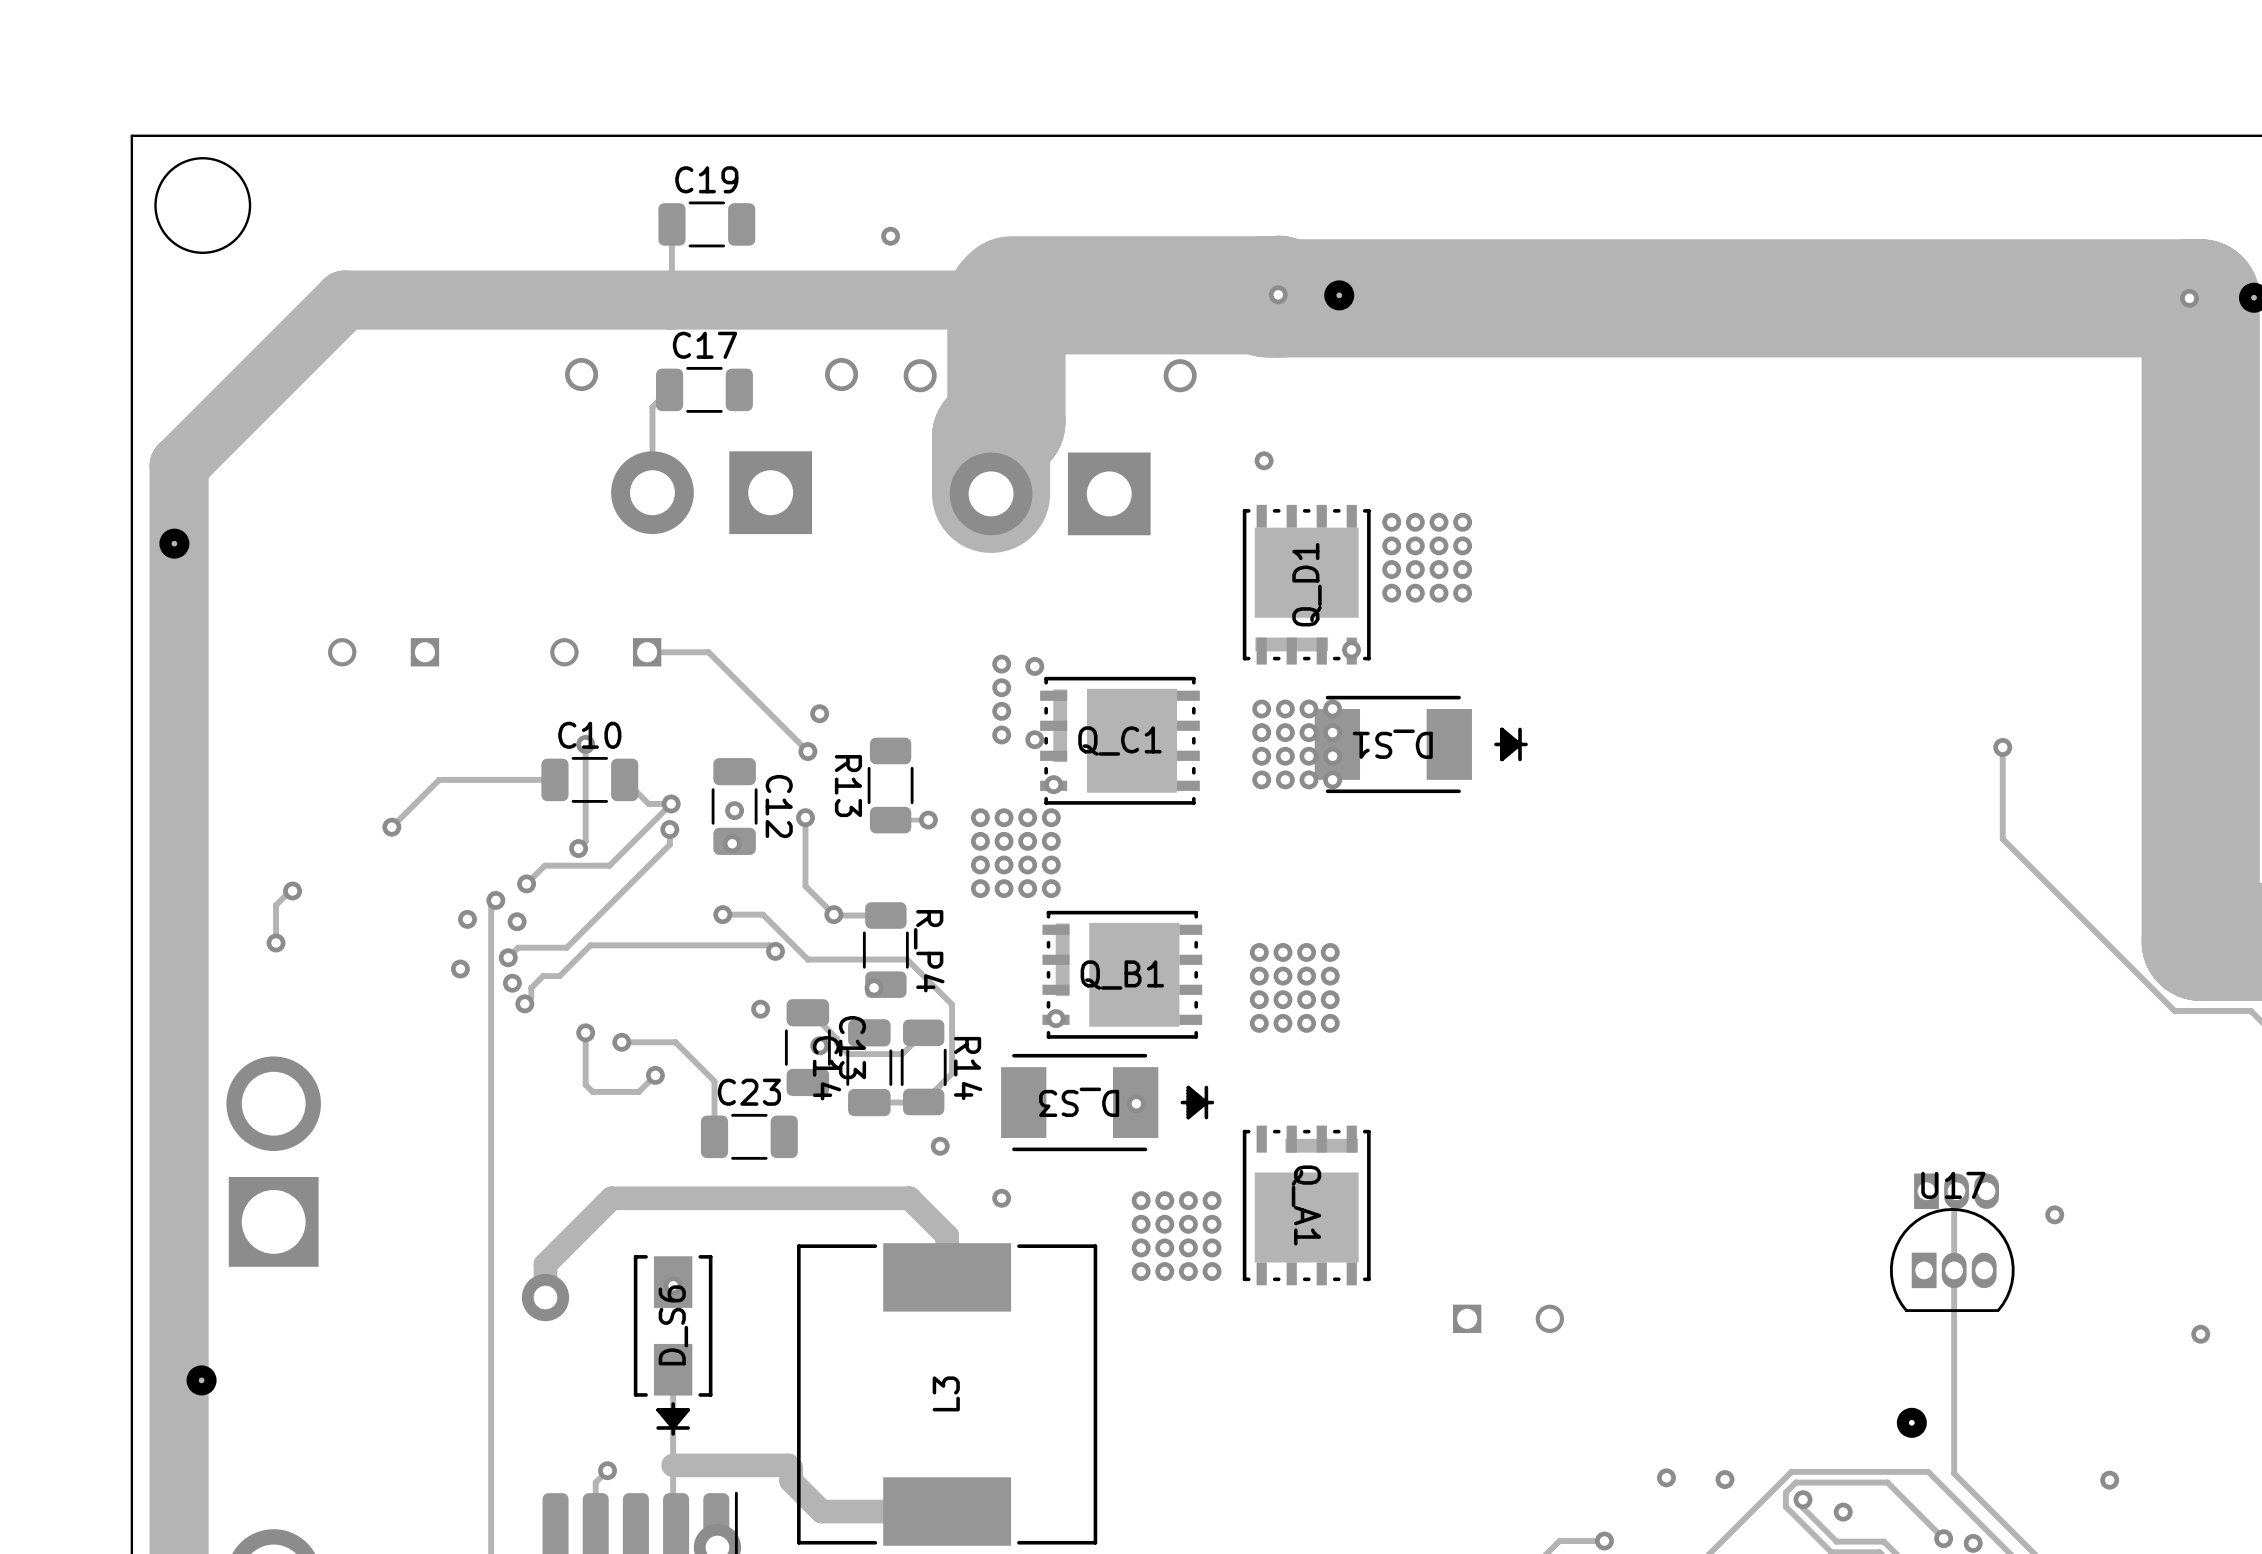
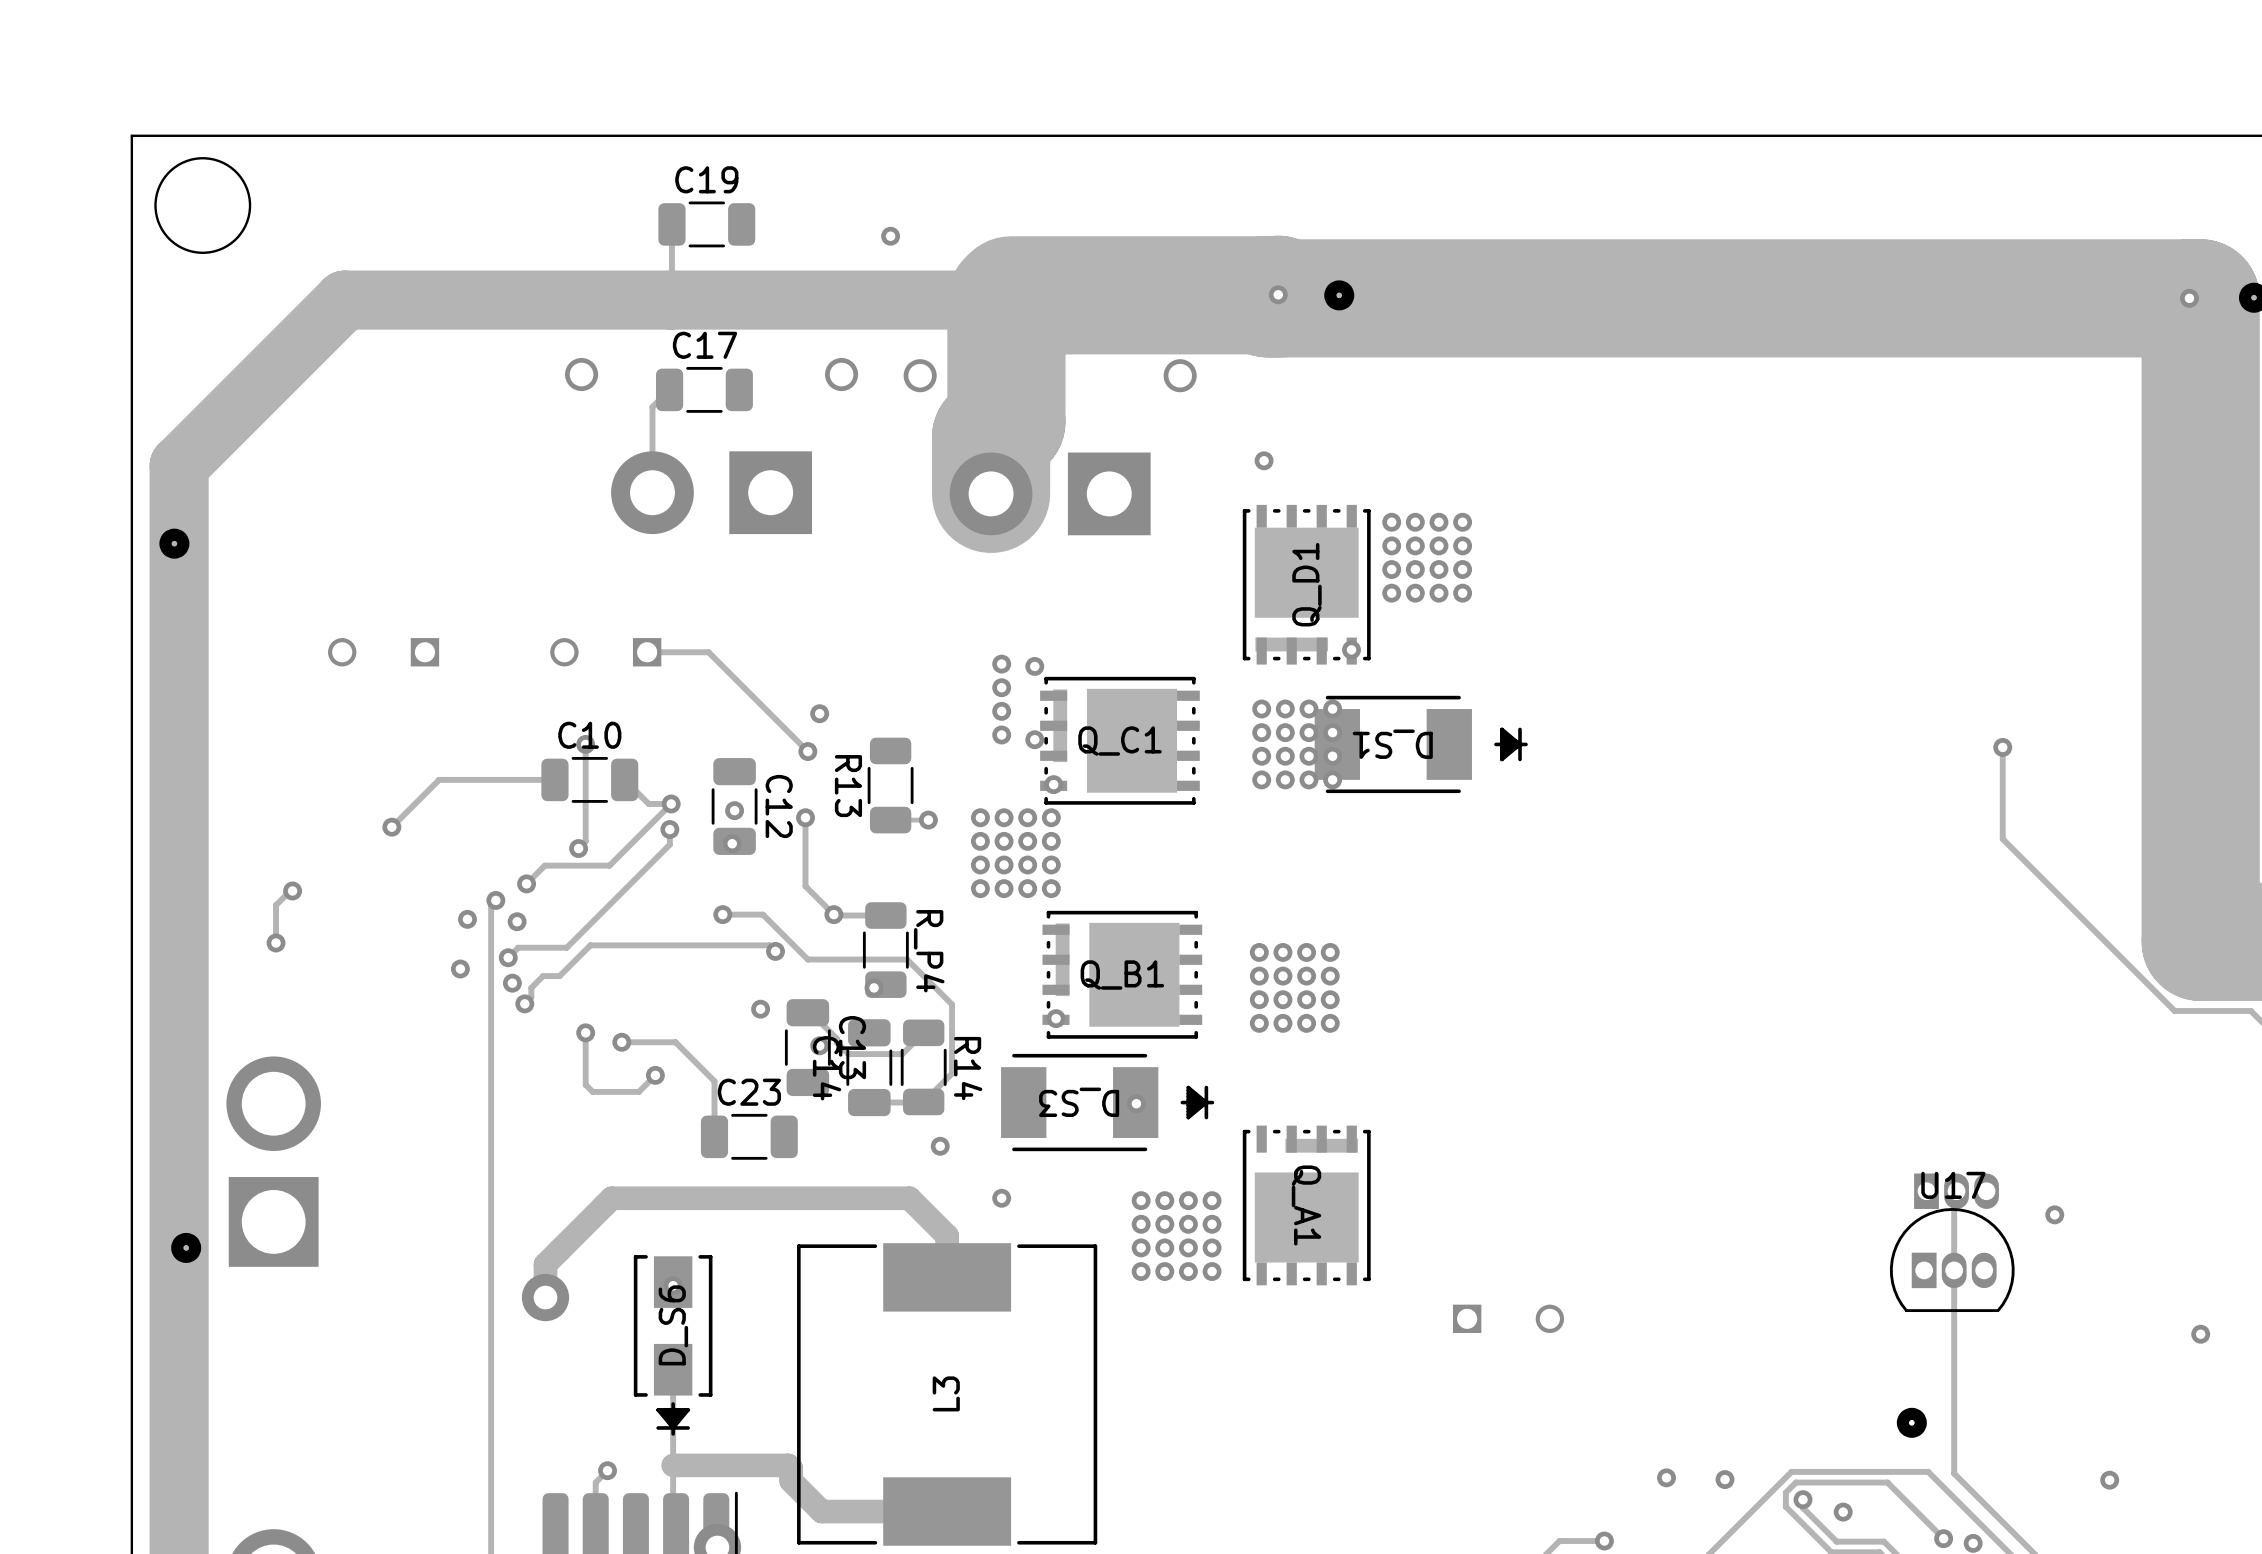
part position: (201, 1380) -> (186, 1247)

